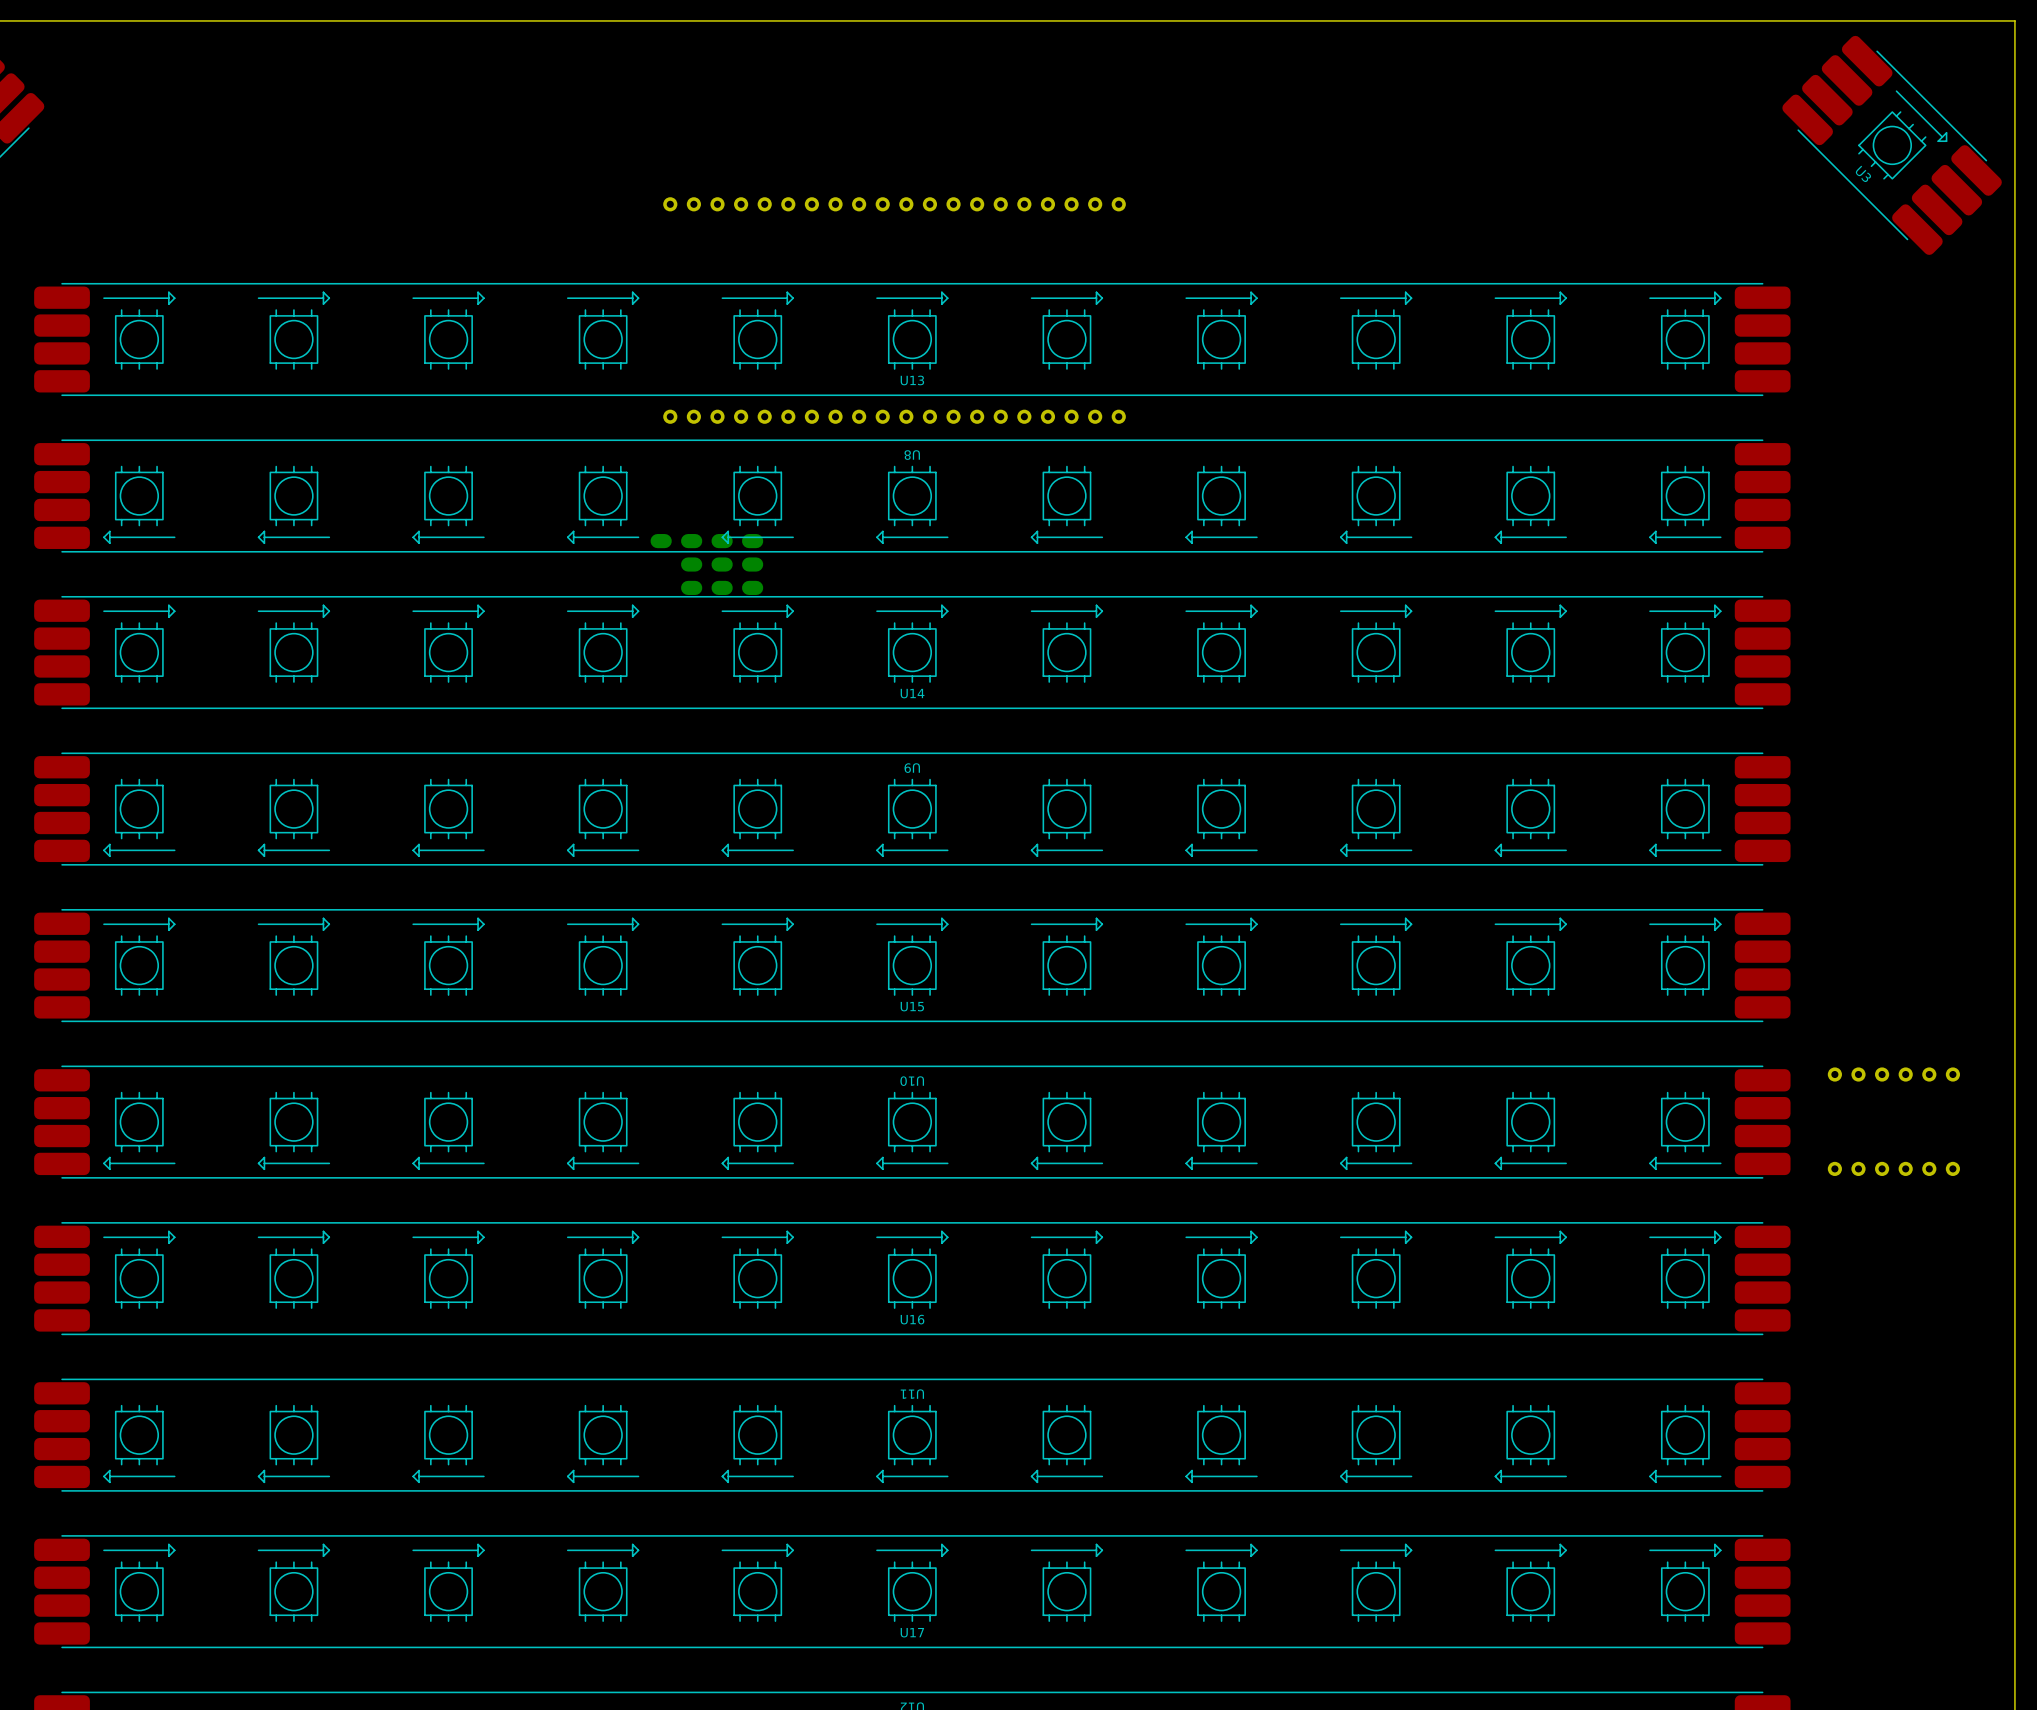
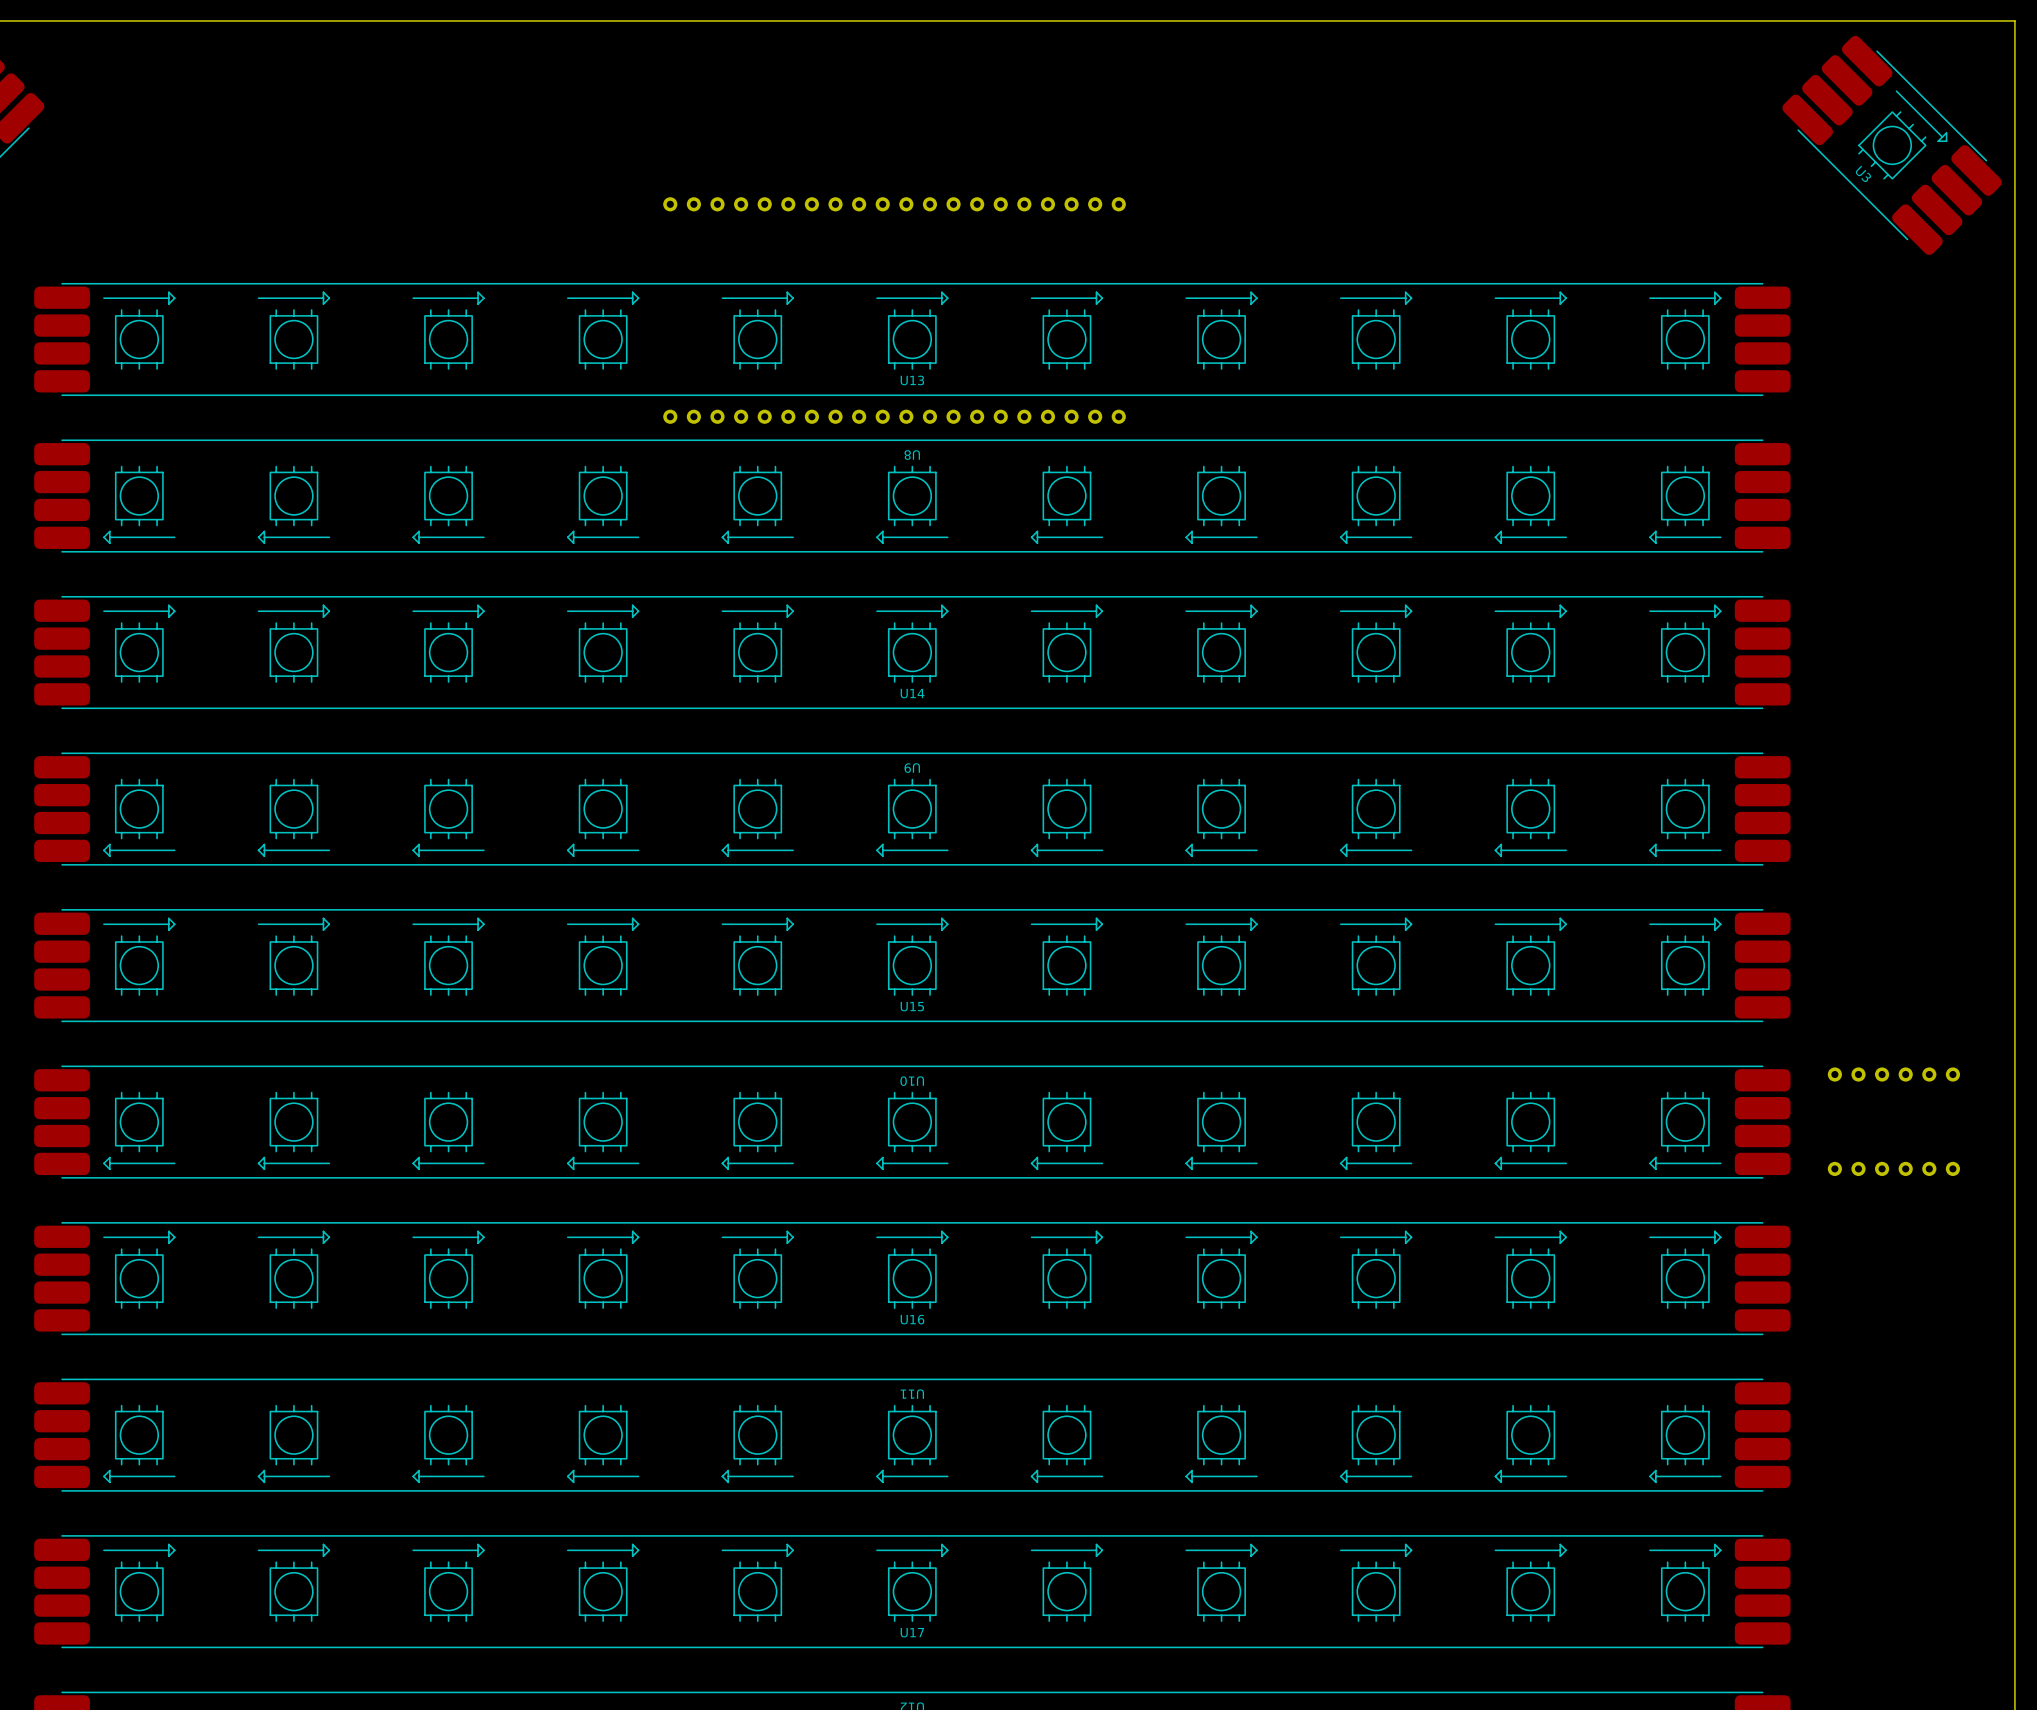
part: (661, 541) -> none
part: (691, 541) -> none
part: (722, 541) -> none
part: (752, 541) -> none
part: (691, 564) -> none
part: (722, 564) -> none
part: (752, 564) -> none
part: (691, 587) -> none
part: (722, 587) -> none
part: (752, 587) -> none

